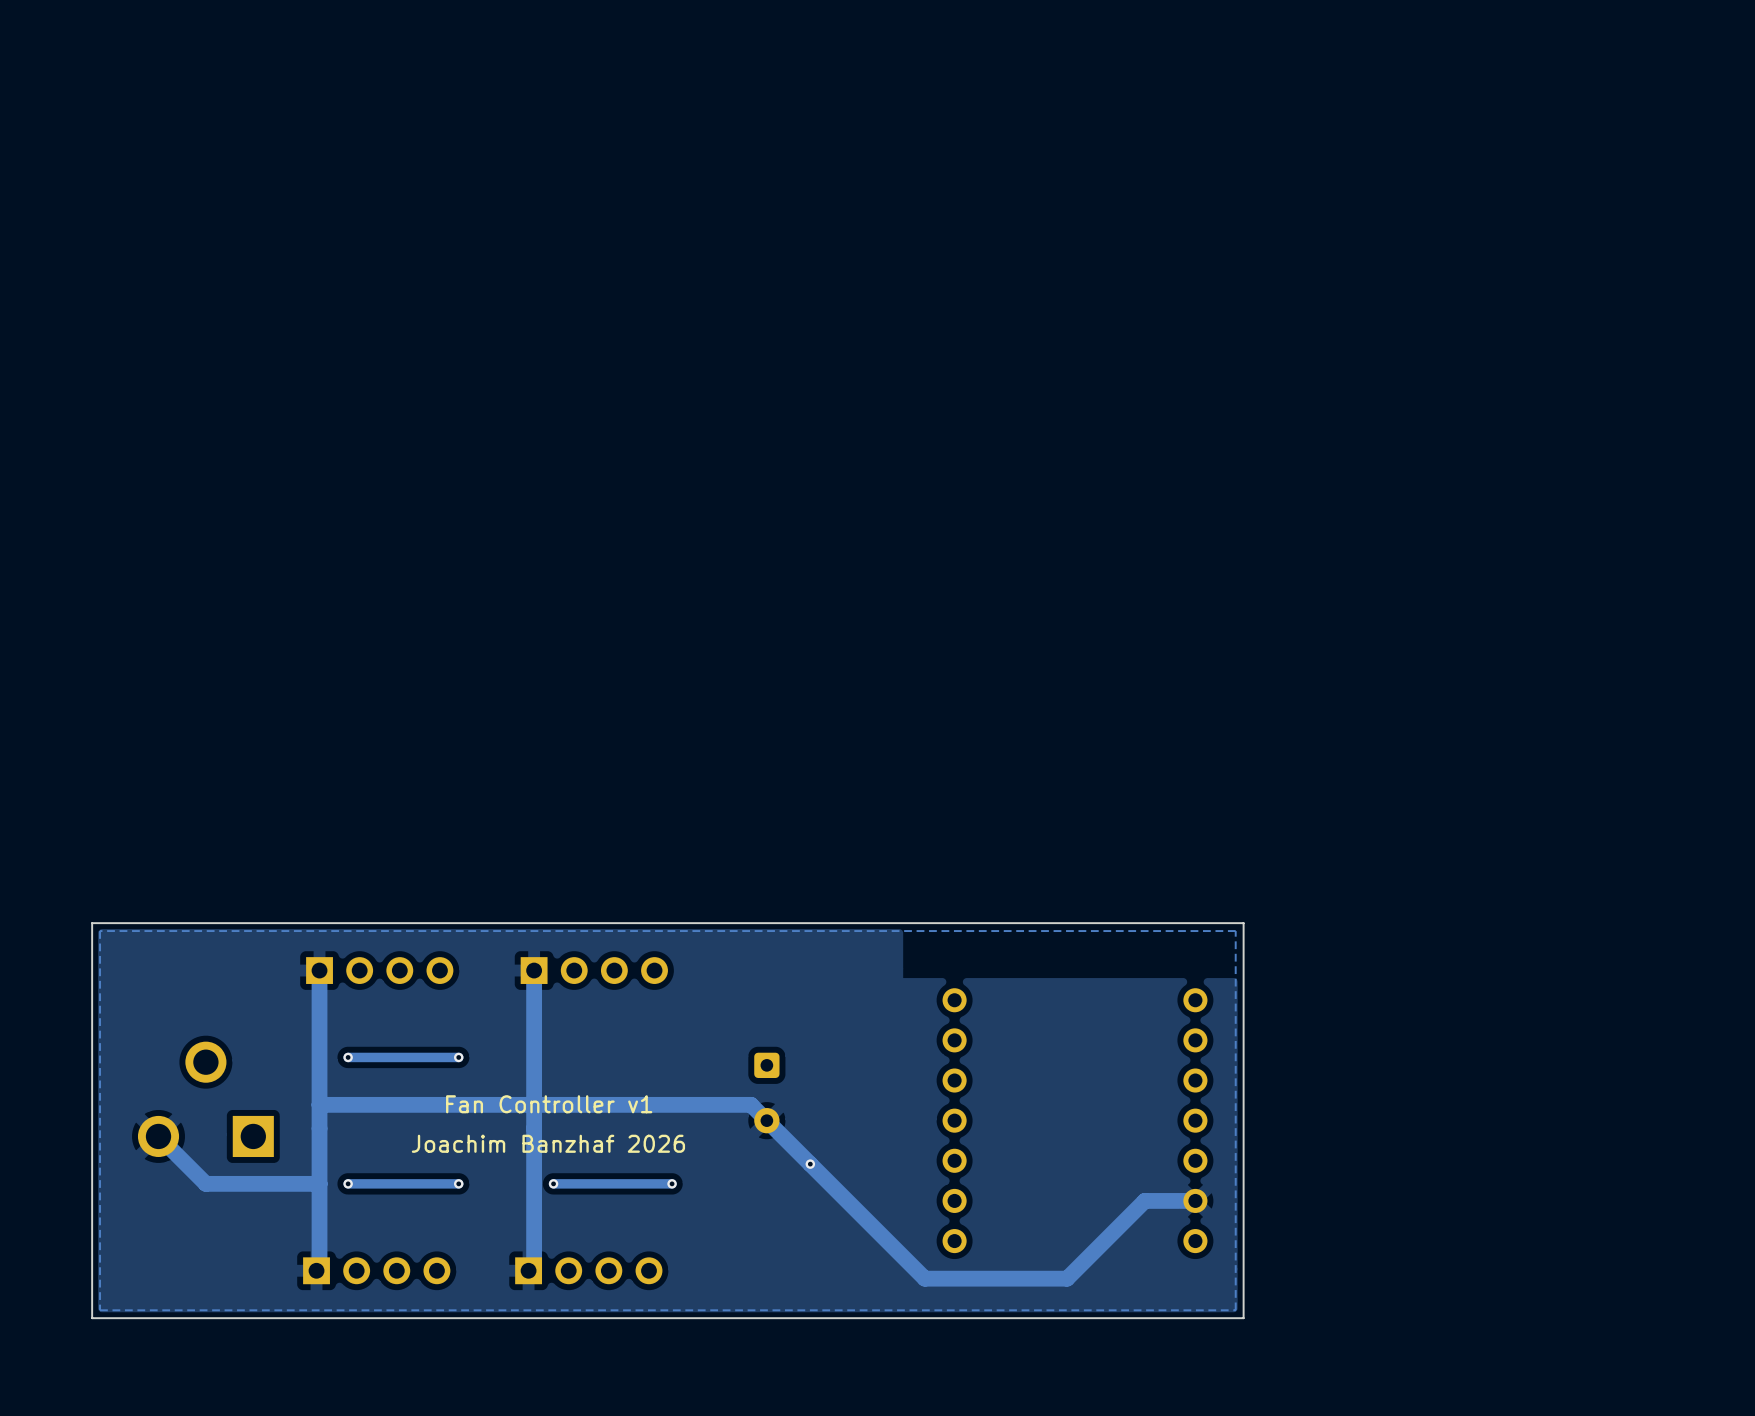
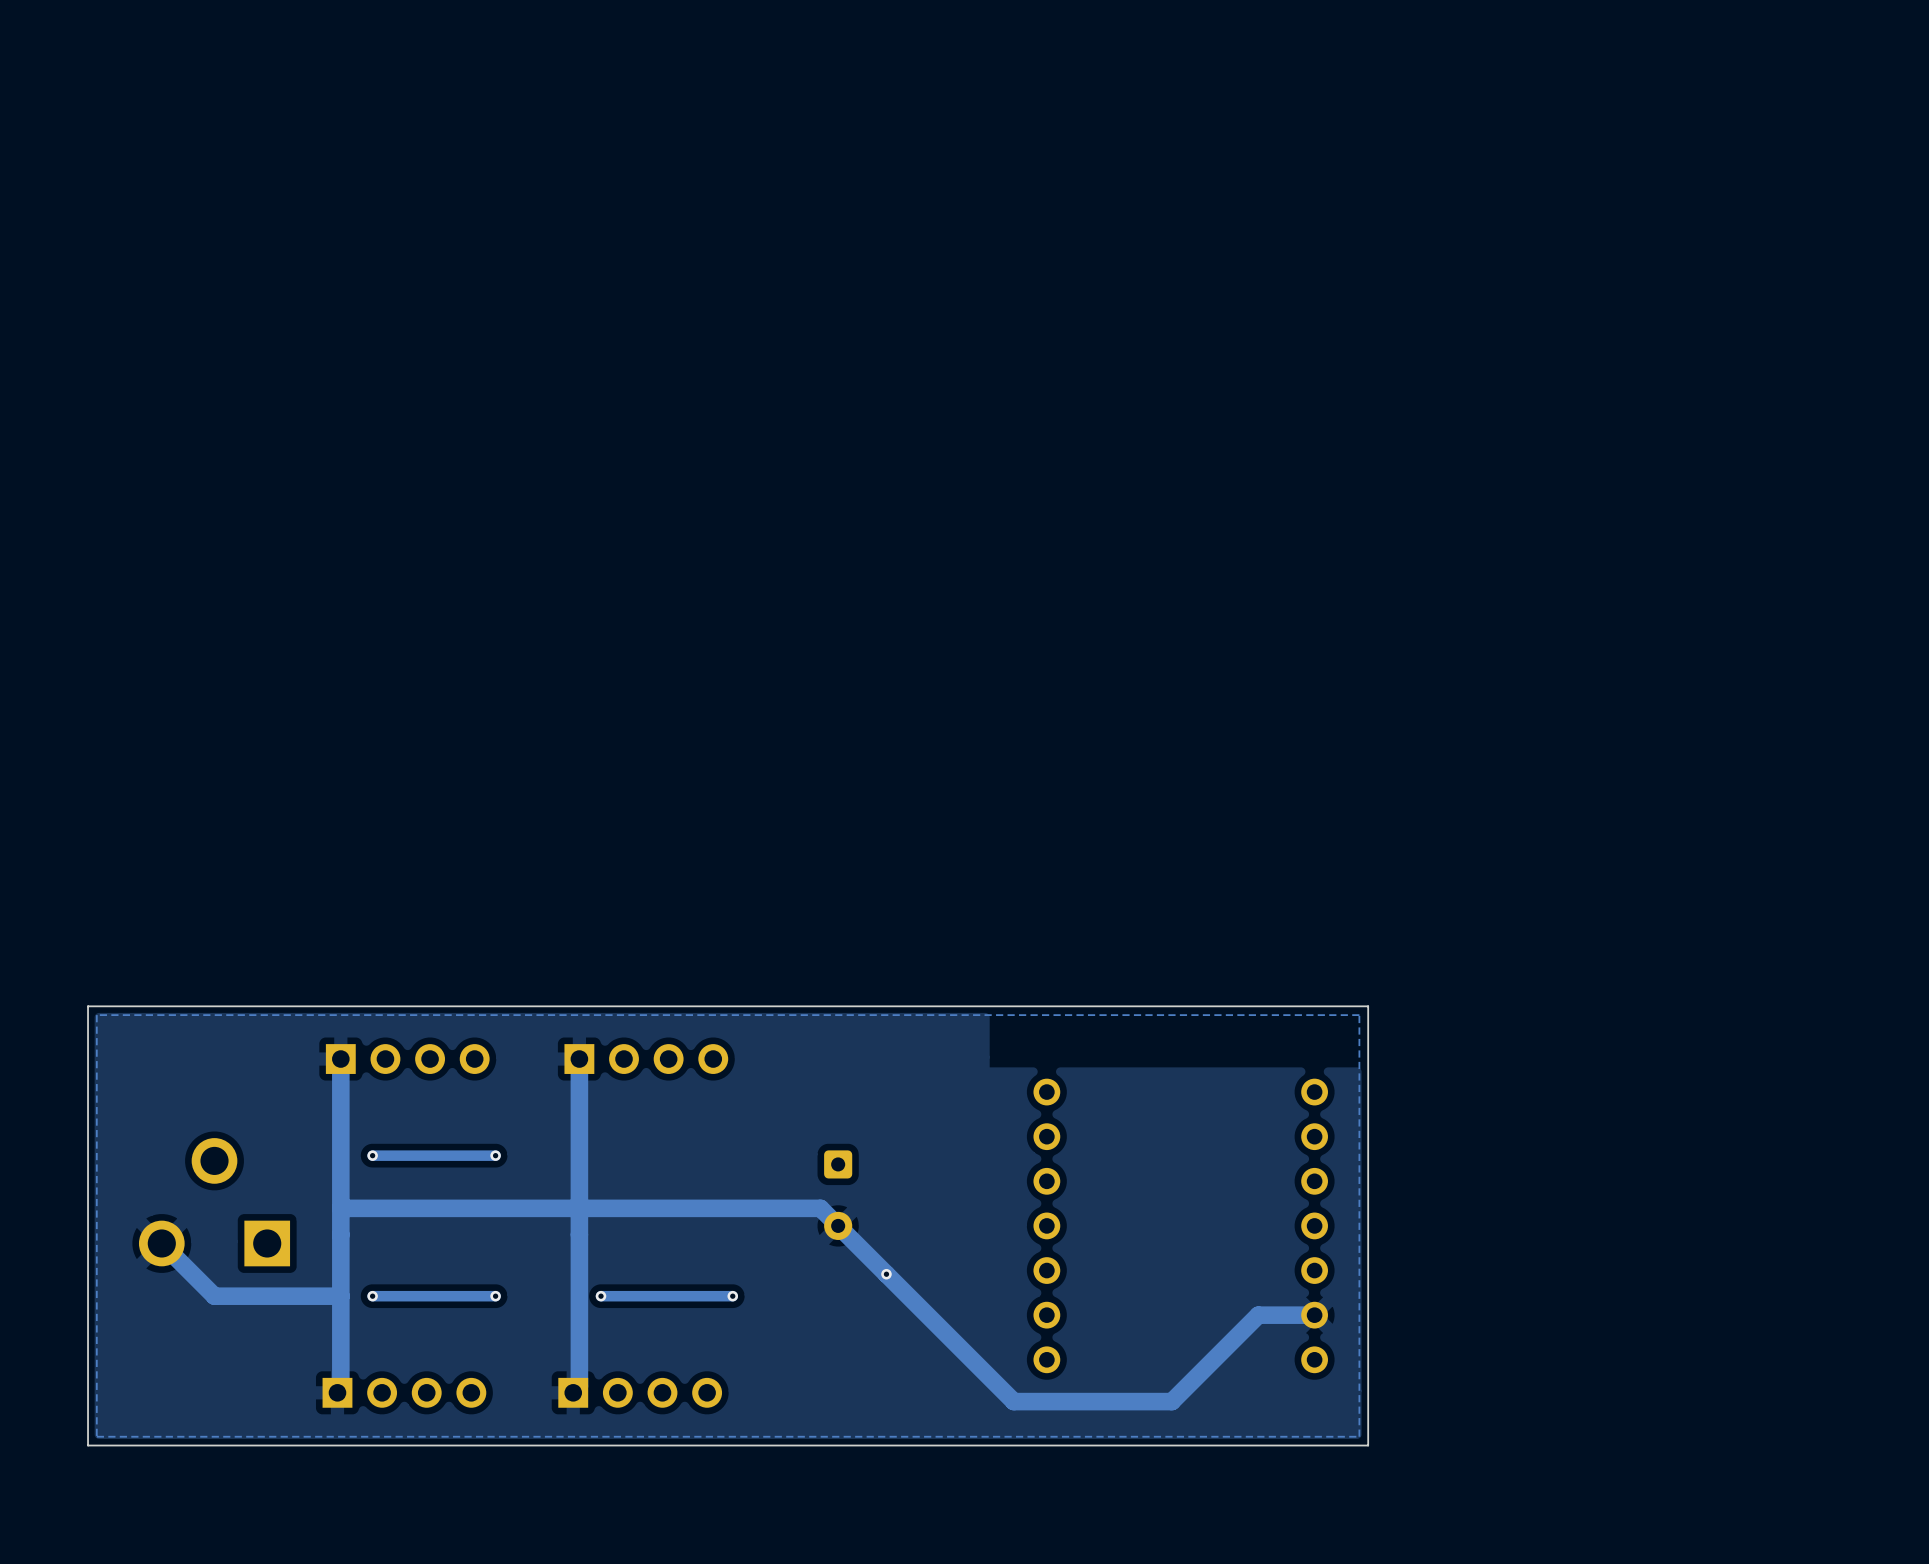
text: Fan Controller v1 (549, 1104) -> none
text: Joachim Banzhaf 2026 (548, 1143) -> none

